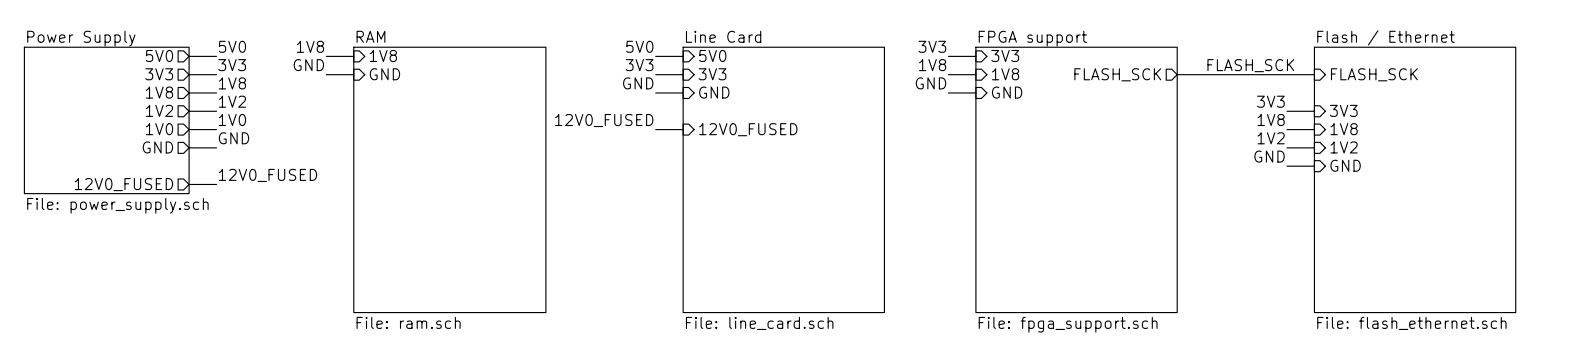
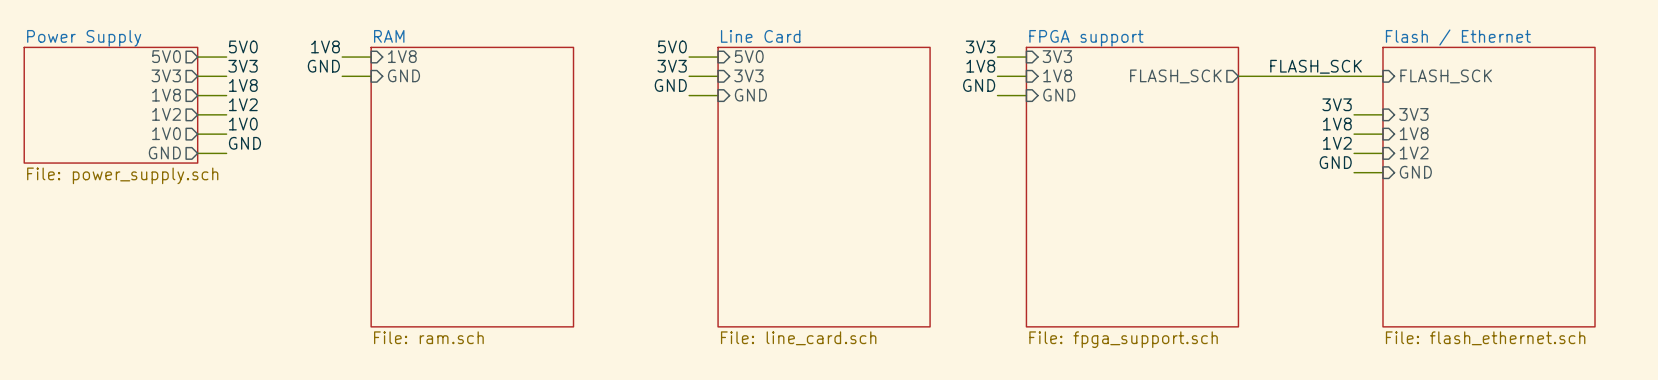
sheet Power Supply: none -> File: power_supply.sch (110, 105)
sheet Power Supply: File: power_supply.sch (106, 120) -> none
label: 12V0_FUSED (604, 120) -> none
wire: (655, 129) (683, 129) -> none
sheet pin: 12V0_FUSED (748, 129) -> none
label: 12V0_FUSED (267, 175) -> none
sheet pin: 12V0_FUSED (123, 184) -> none
wire: (189, 184) (216, 184) -> none

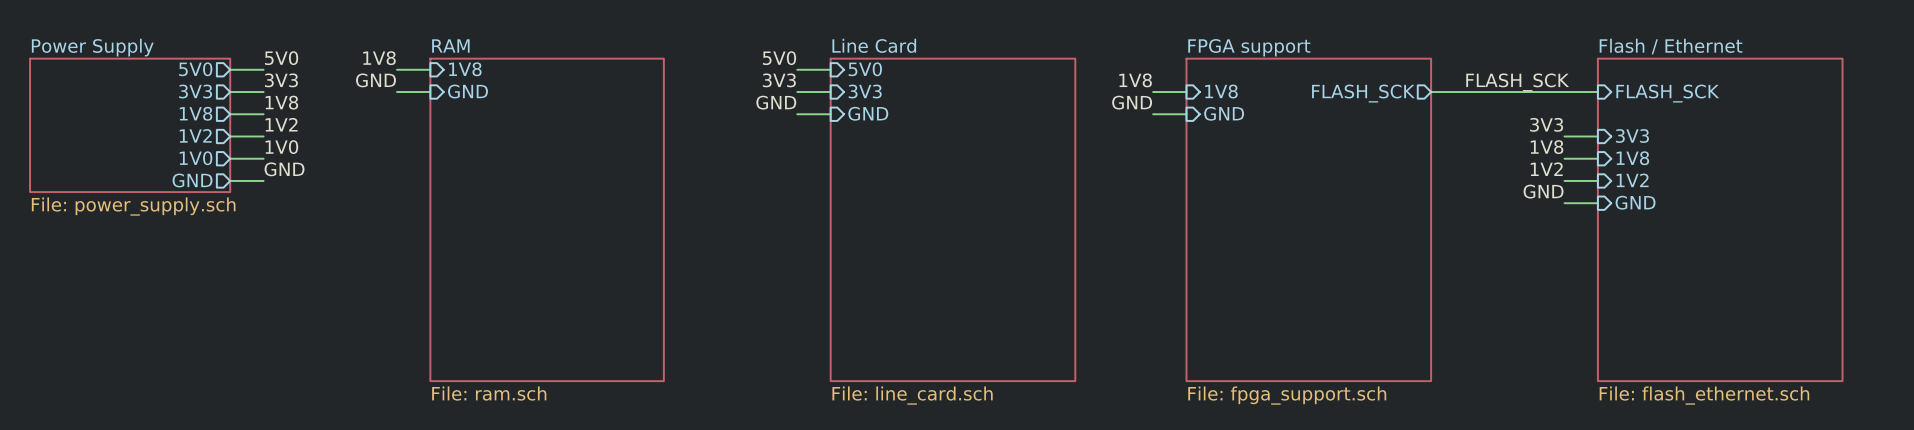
label: 3V3 (980, 46) -> none
sheet pin: 3V3 (1057, 56) -> none
wire: (997, 57) (1026, 57) -> none

